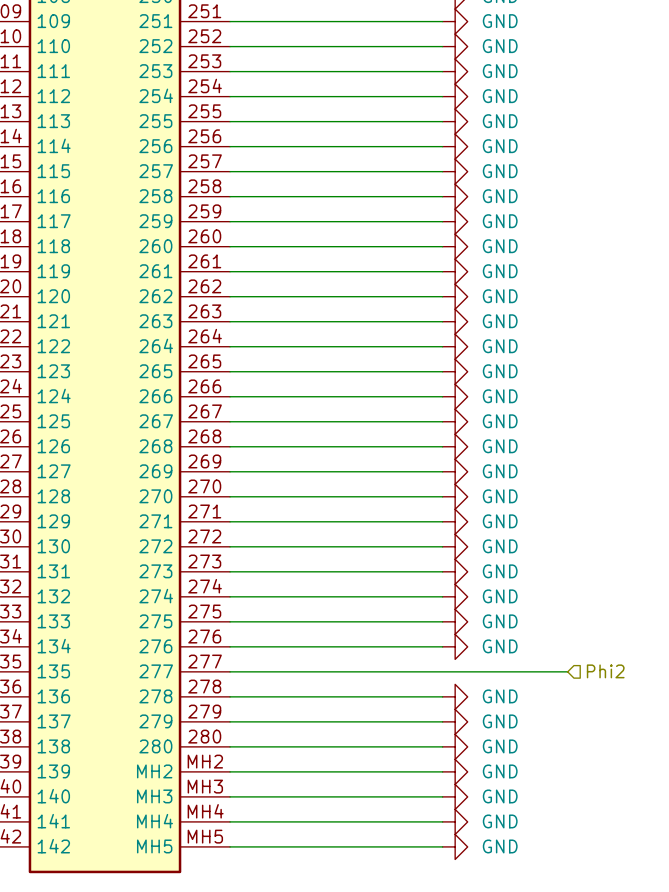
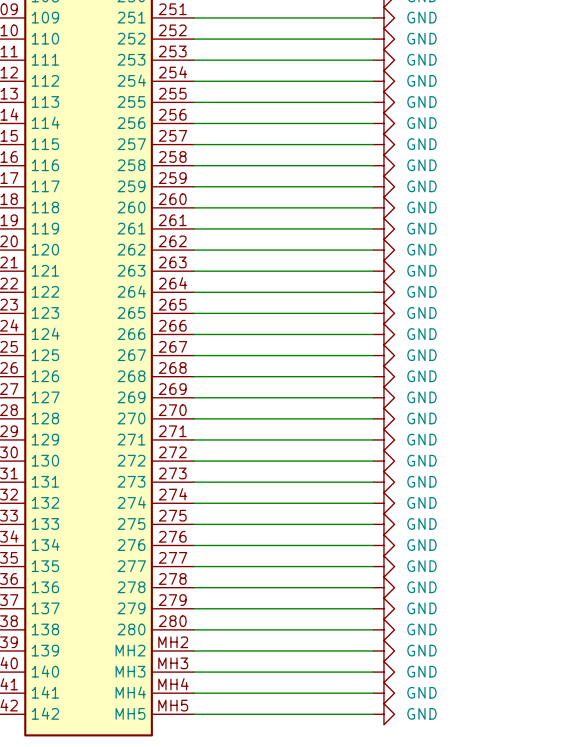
wire: (442, 671) (567, 671) -> none
power symbol: none -> GND (383, 566)
hierarchical label: Phi2 (605, 671) -> none

